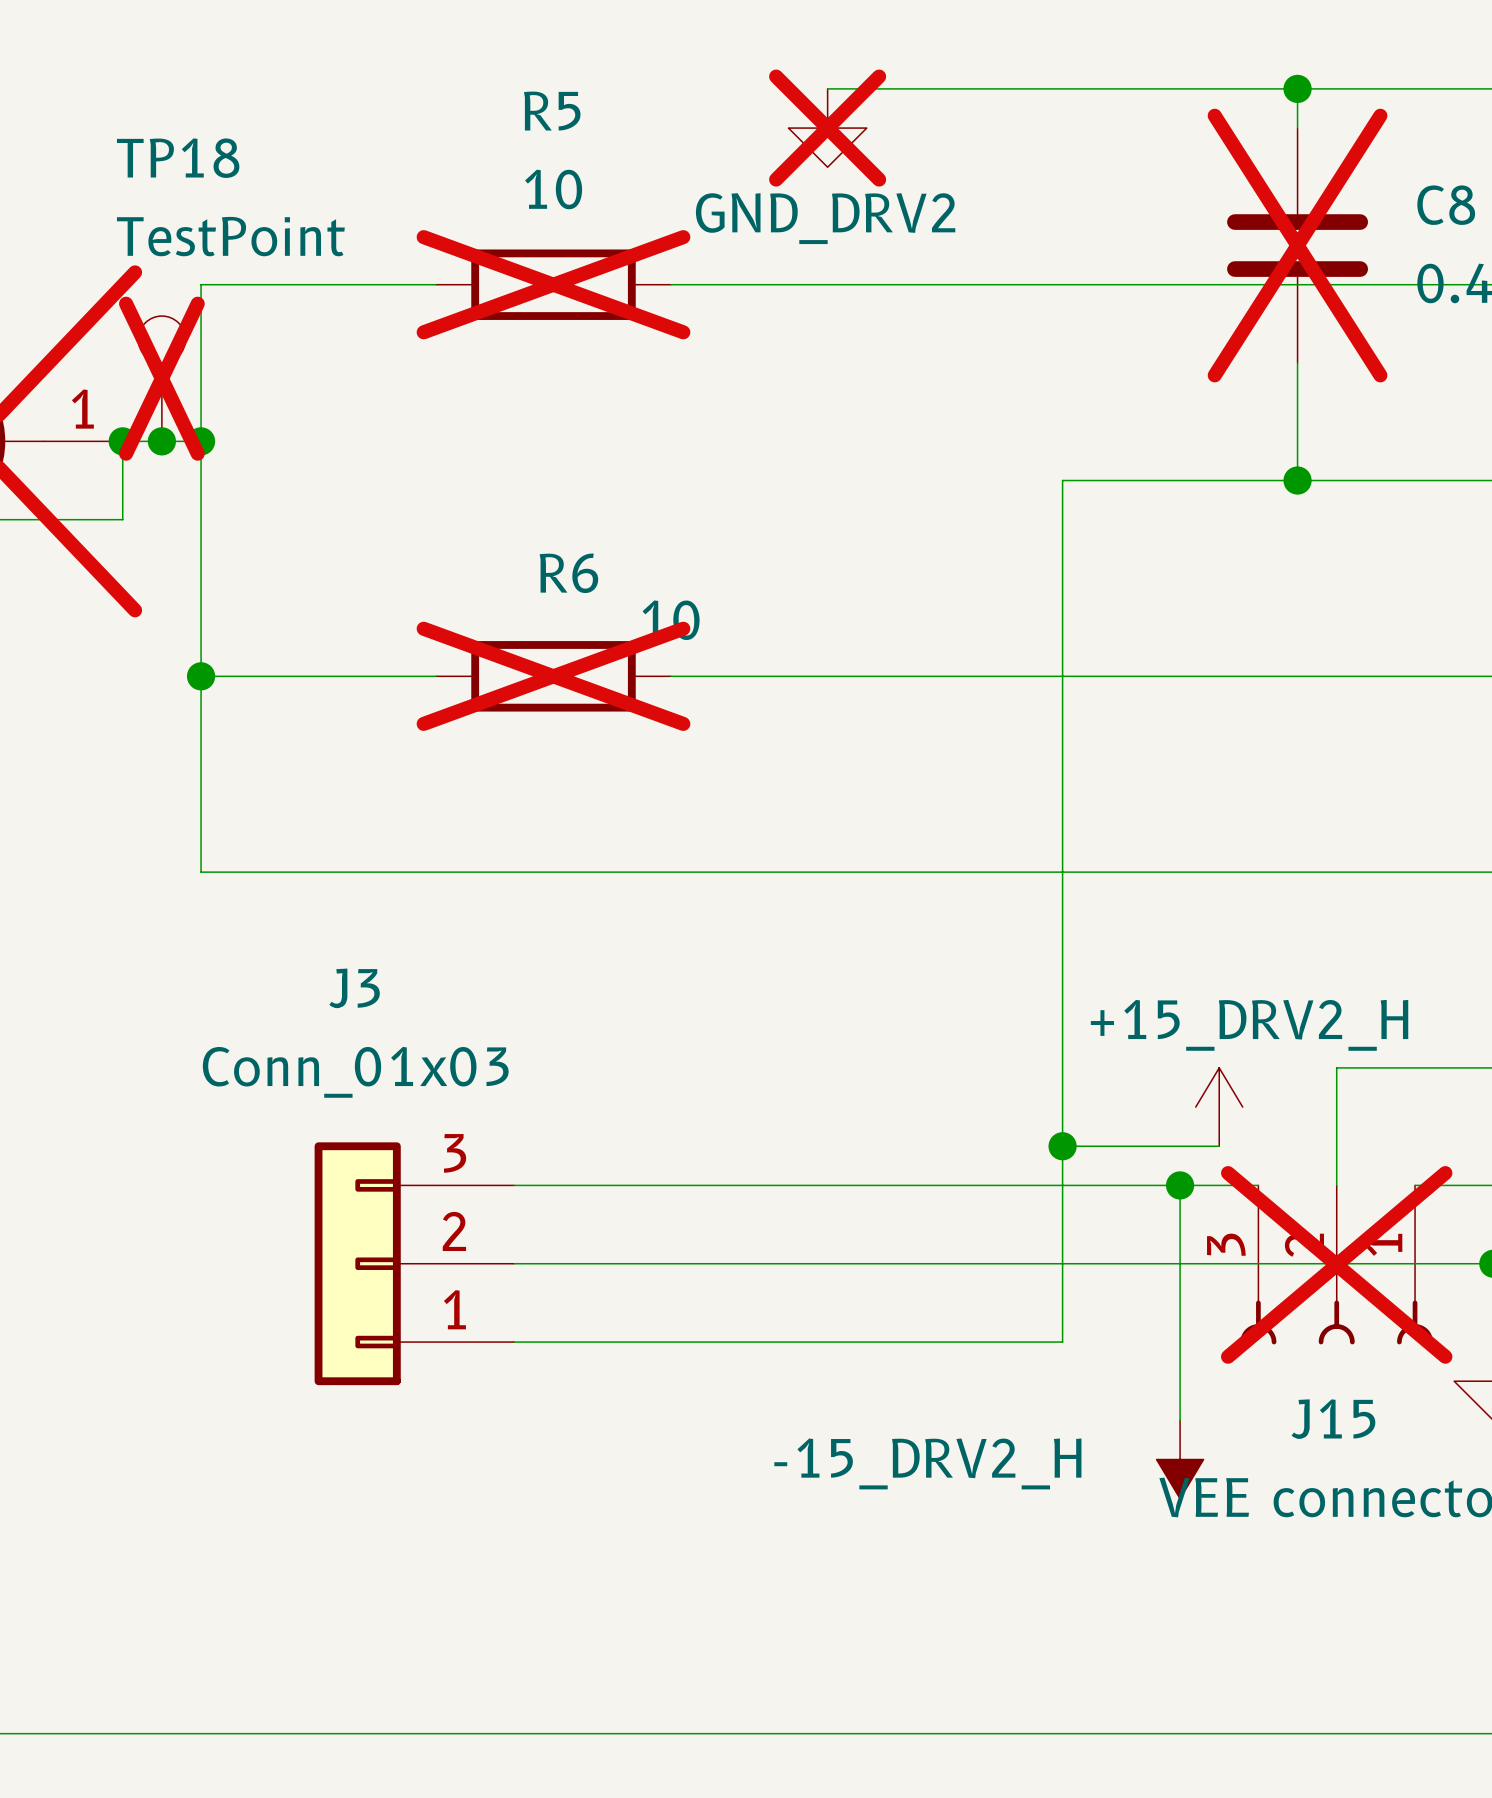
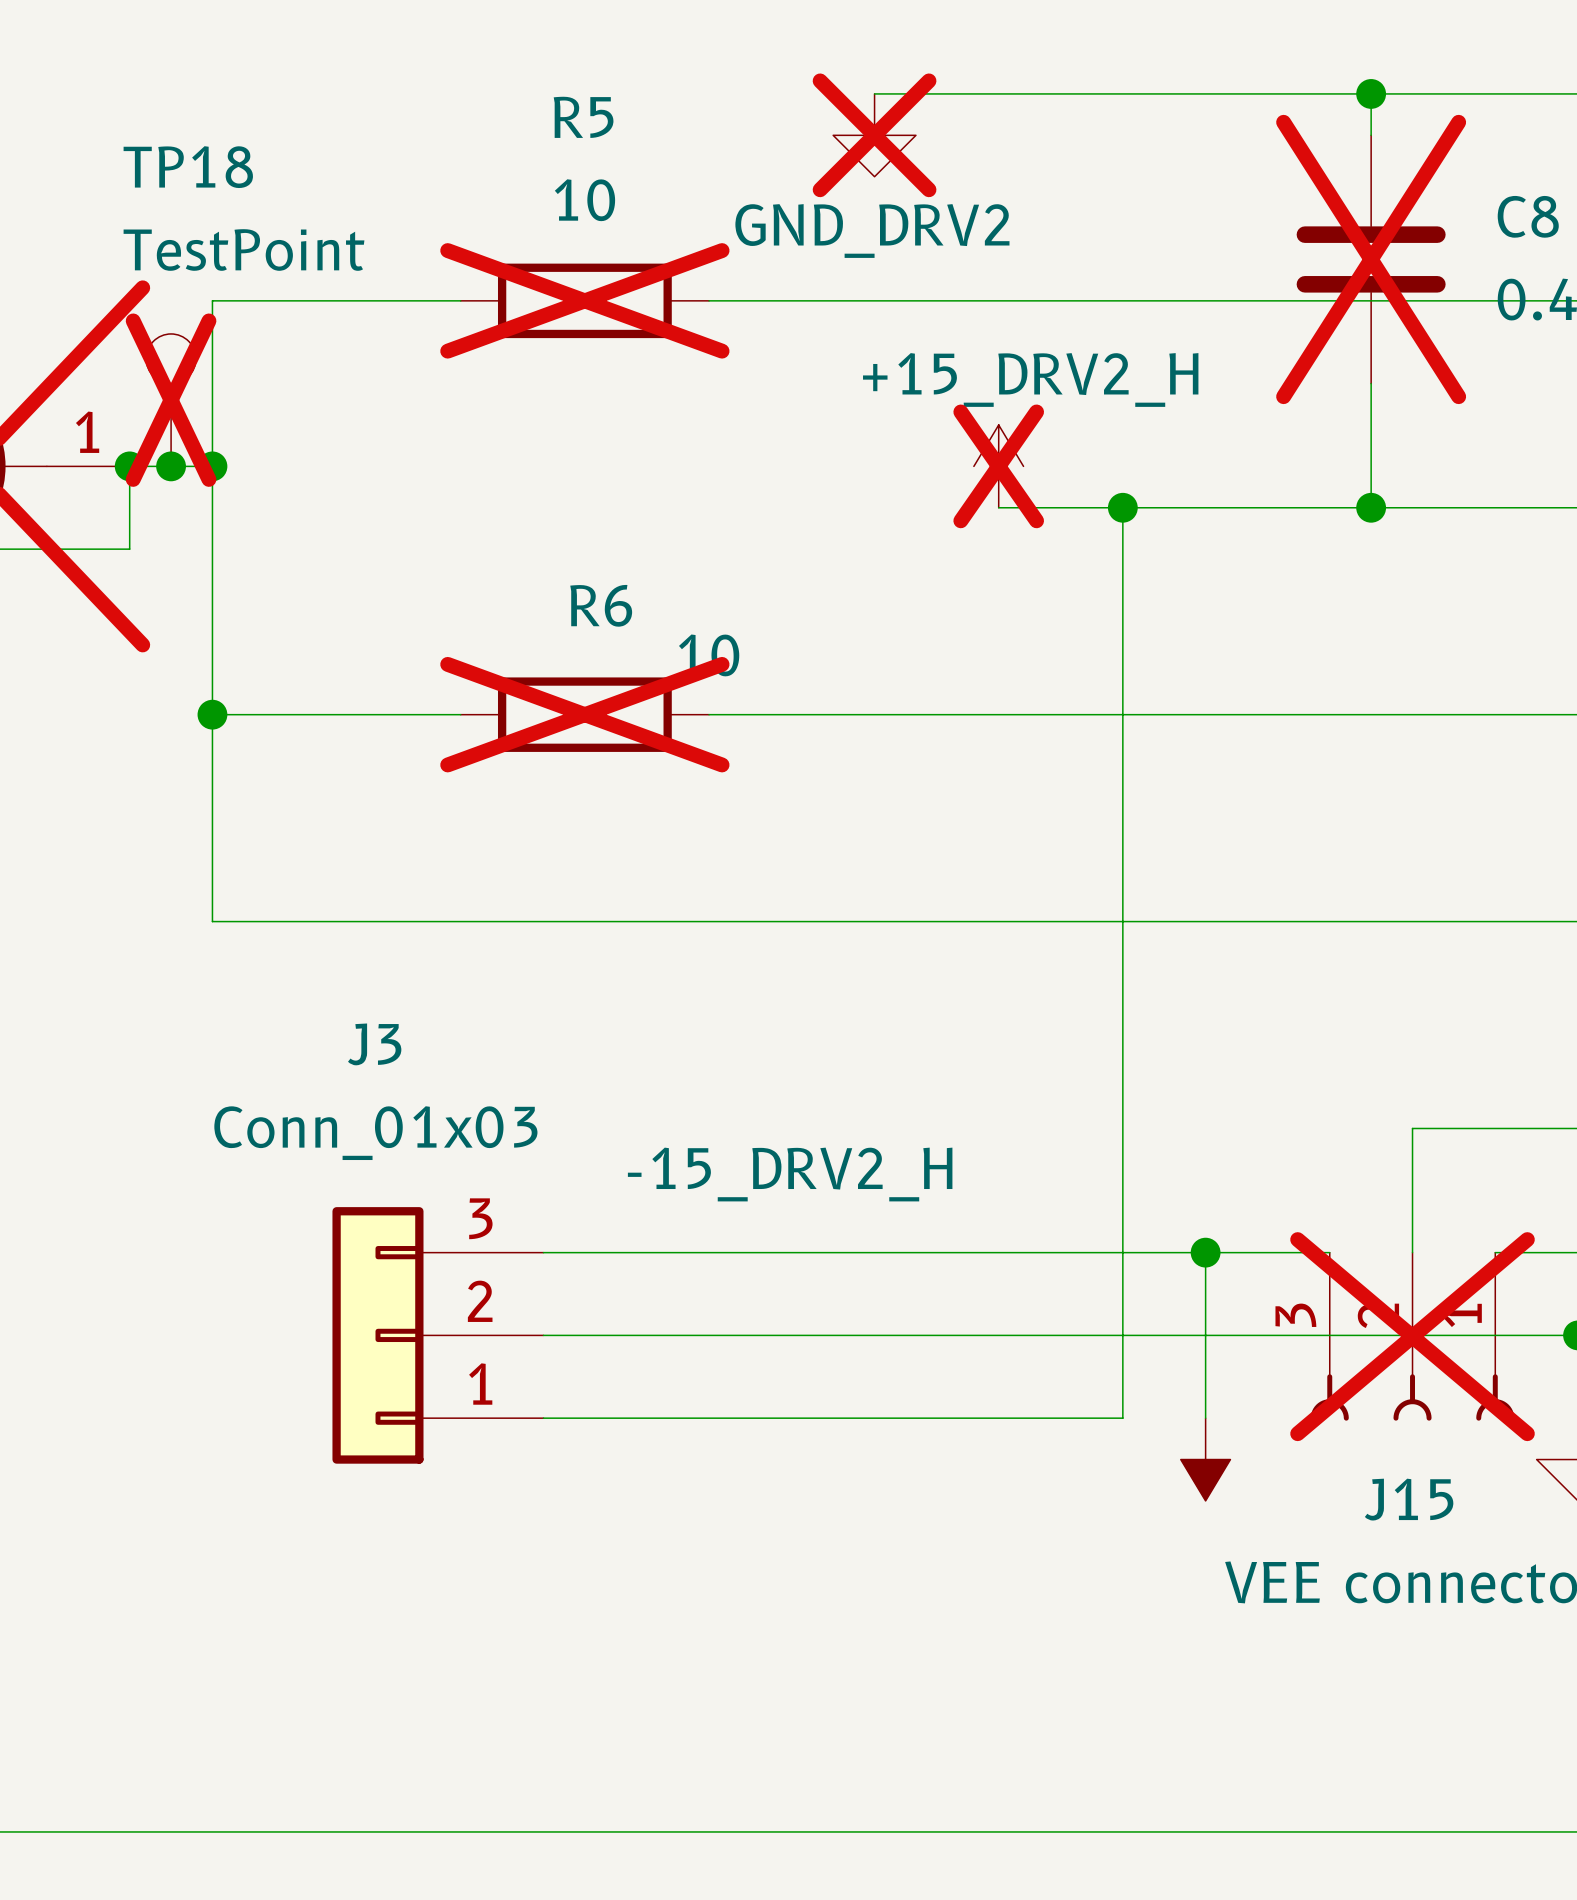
power symbol do-not-place cross: none -> (998, 466)
wire: none -> (998, 507) (1122, 507)
junction: none -> (1122, 507)
power symbol position: +15_DRV2_H (1219, 1107) -> +15_DRV2_H (998, 466)
wire: (1062, 1146) (1219, 1146) -> none
junction: (1062, 1146) -> none
wire: none -> (1205, 1252) (1205, 1418)
wire: (1180, 1185) (1180, 1420) -> none
junction position: (1180, 1185) -> (1205, 1252)
power symbol position: -15_DRV2_H (1180, 1459) -> -15_DRV2_H (1205, 1459)
power symbol text position: -15_DRV2_H (927, 1463) -> -15_DRV2_H (790, 1174)

